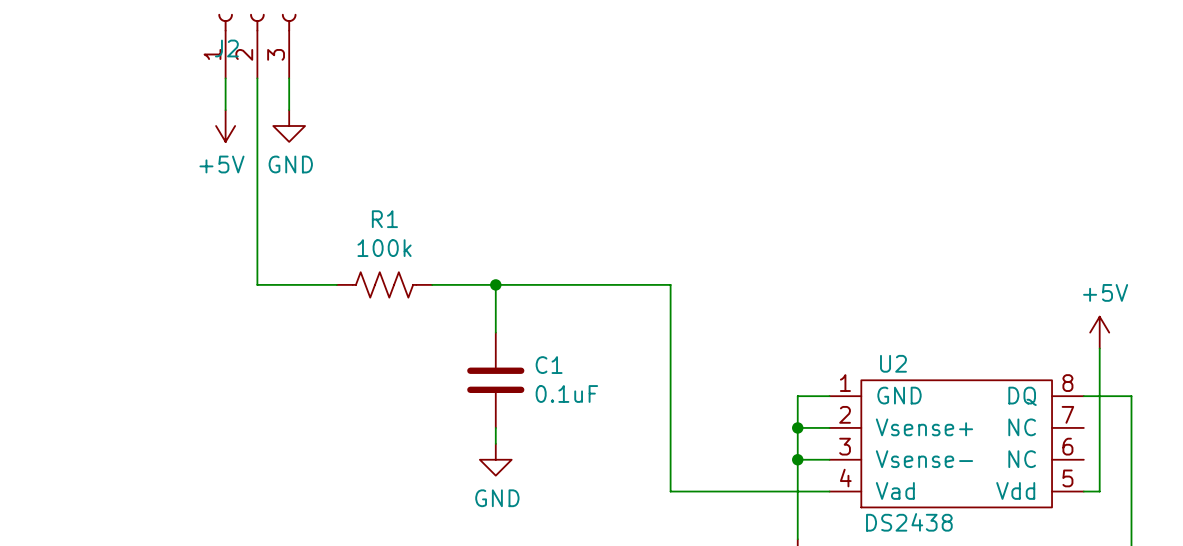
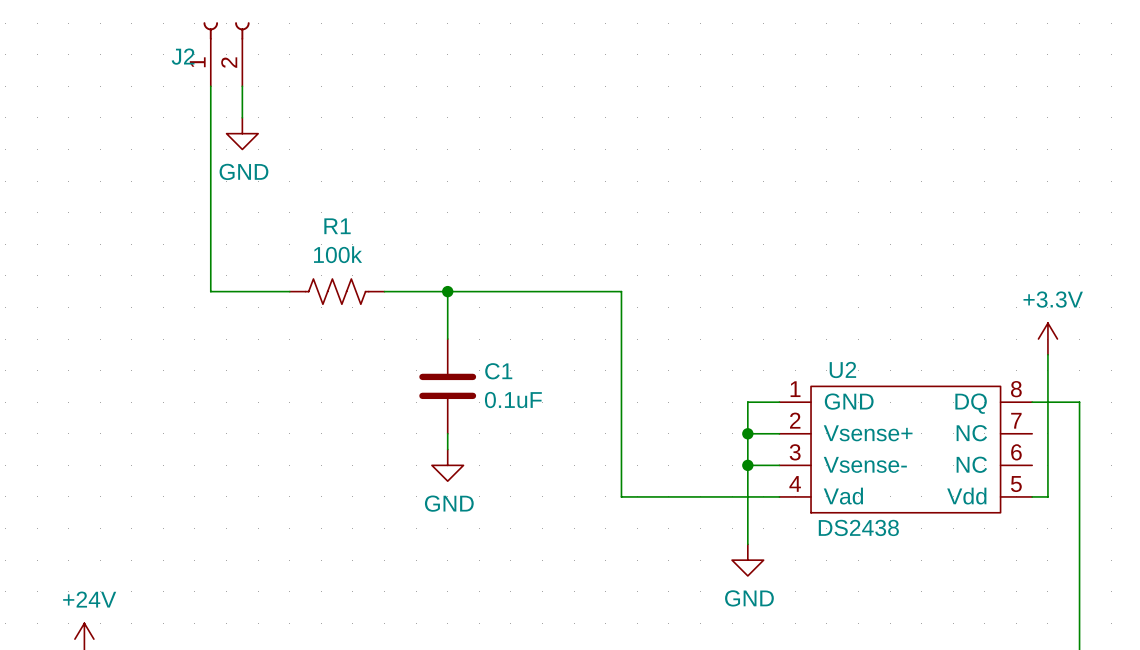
J2 symbol: [218, 13, 297, 79] -> [203, 22, 250, 87]
wire: (225, 78) (225, 110) -> none
power symbol: +5V (225, 126) -> none
power symbol: +5V (1099, 332) -> +3.3V (1047, 339)

